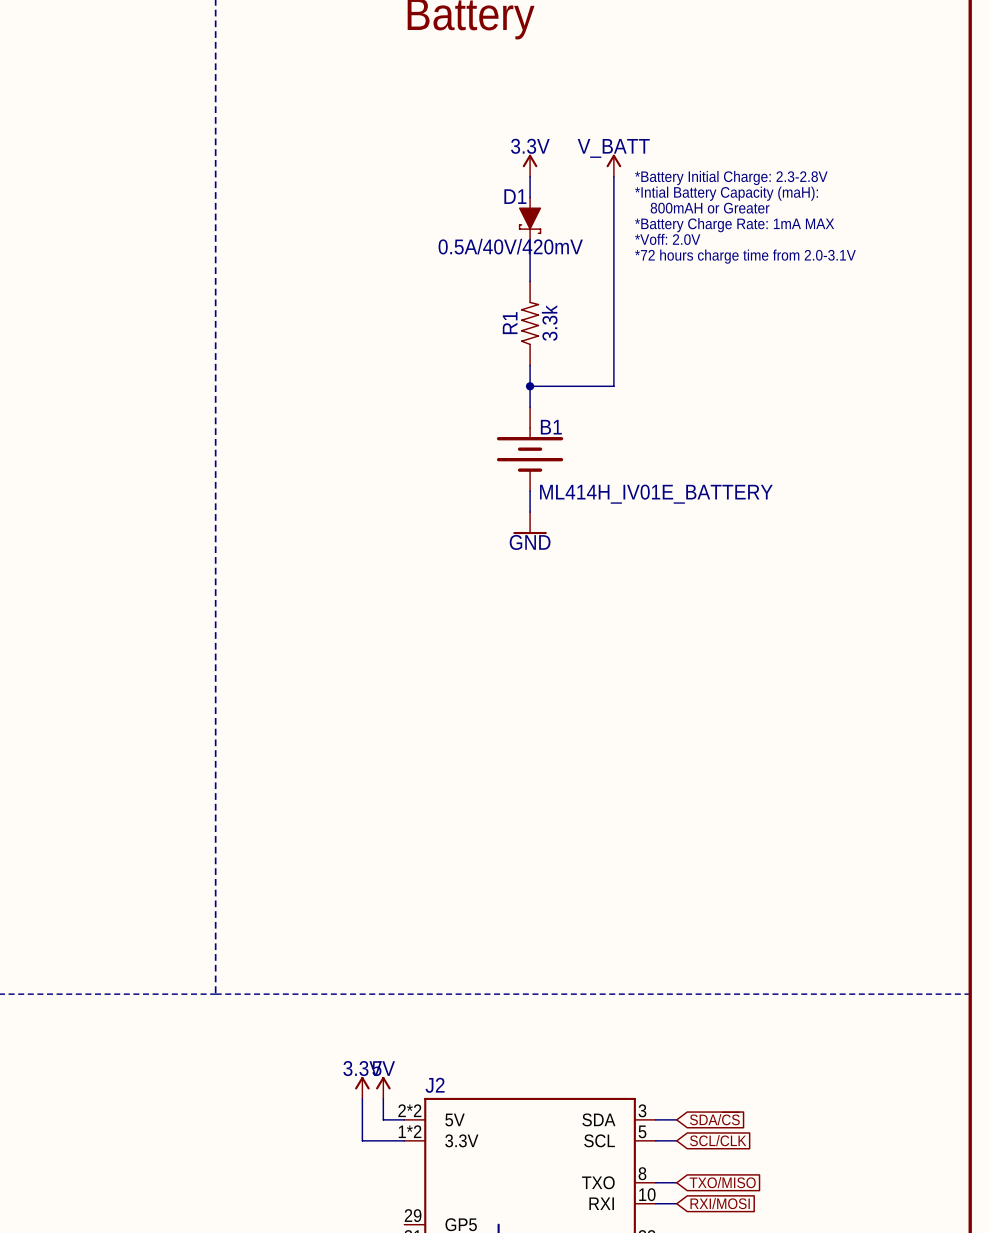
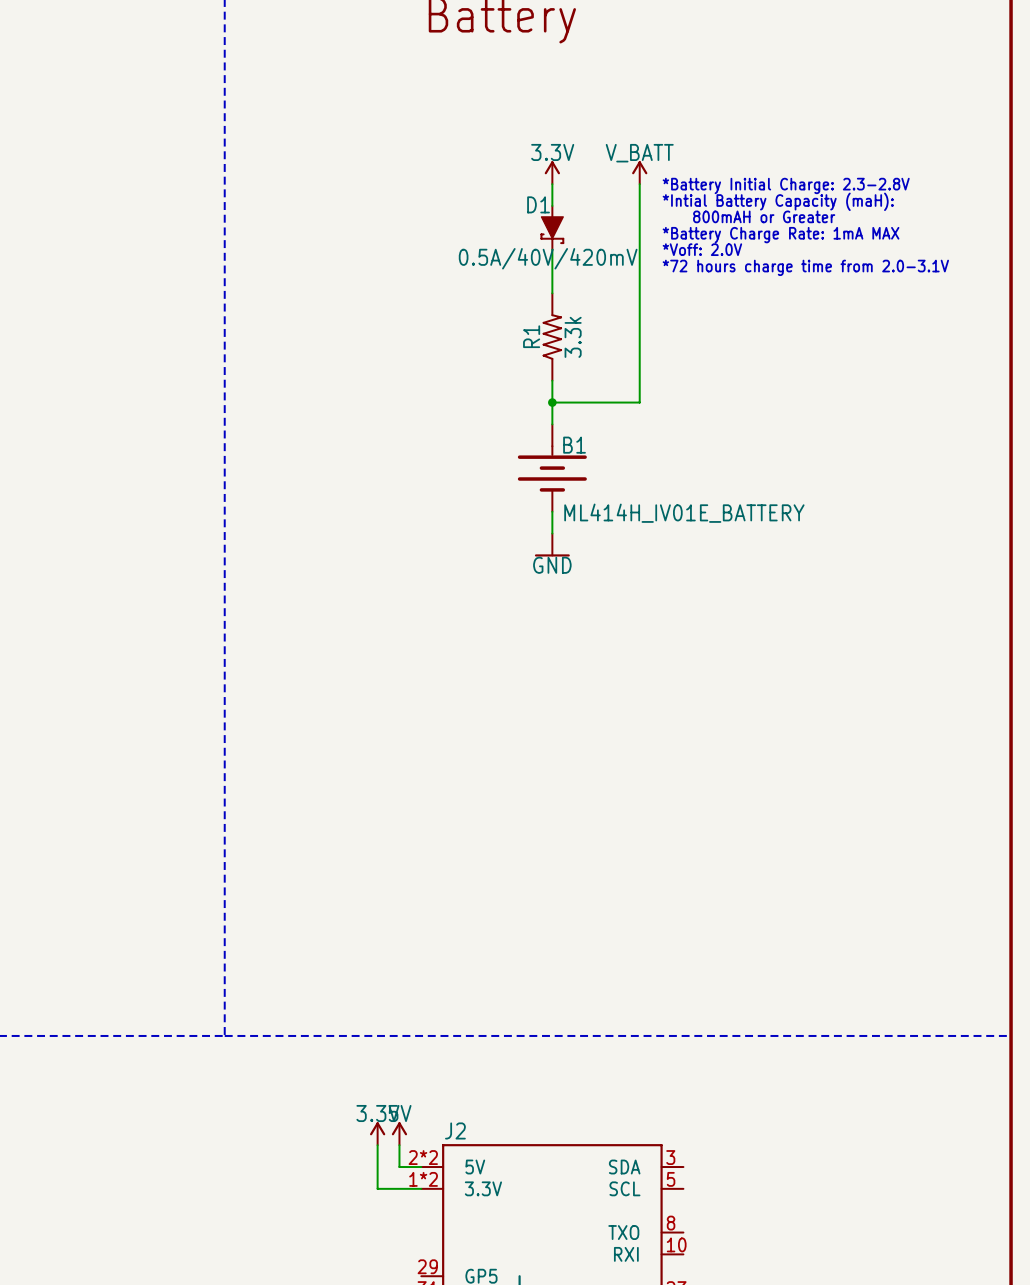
global label: SDA/~{CS} (714, 1118) -> none
wire: (655, 1119) (676, 1119) -> none
wire: (655, 1140) (676, 1140) -> none
global label: SCL/CLK (718, 1140) -> none
wire: (655, 1182) (676, 1182) -> none
global label: TXO/MISO (722, 1182) -> none
wire: (655, 1203) (676, 1203) -> none
global label: RXI/MOSI (720, 1203) -> none

